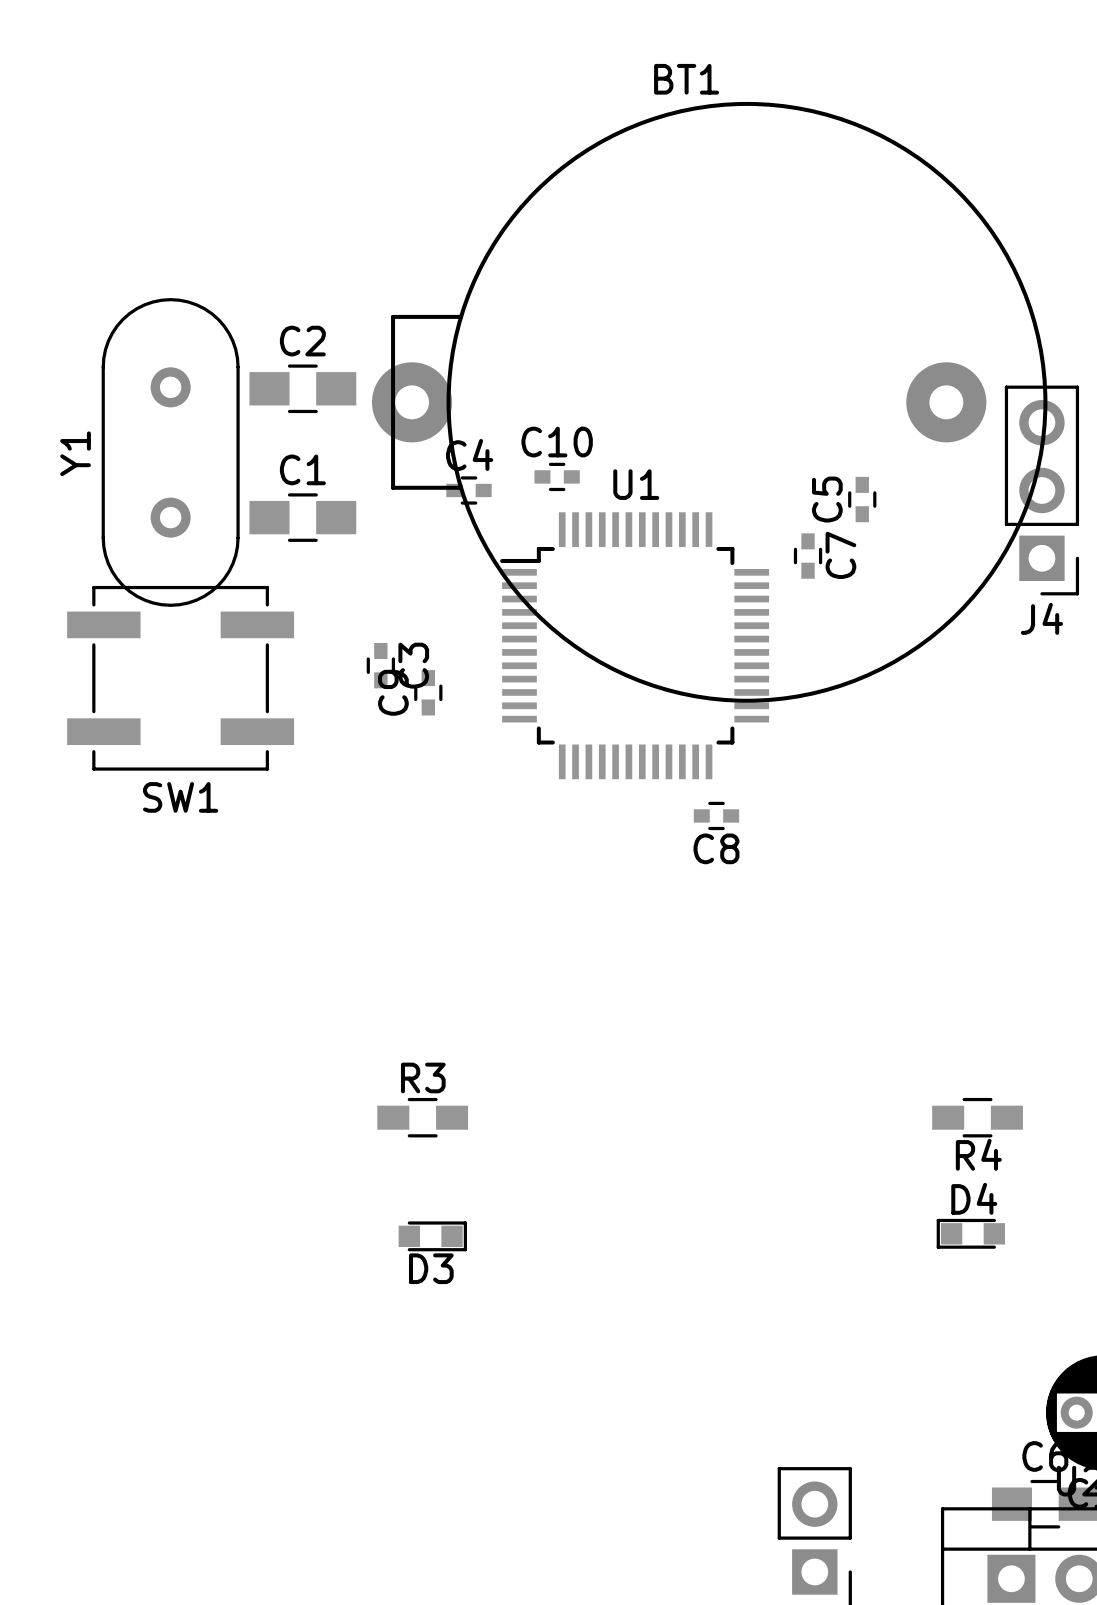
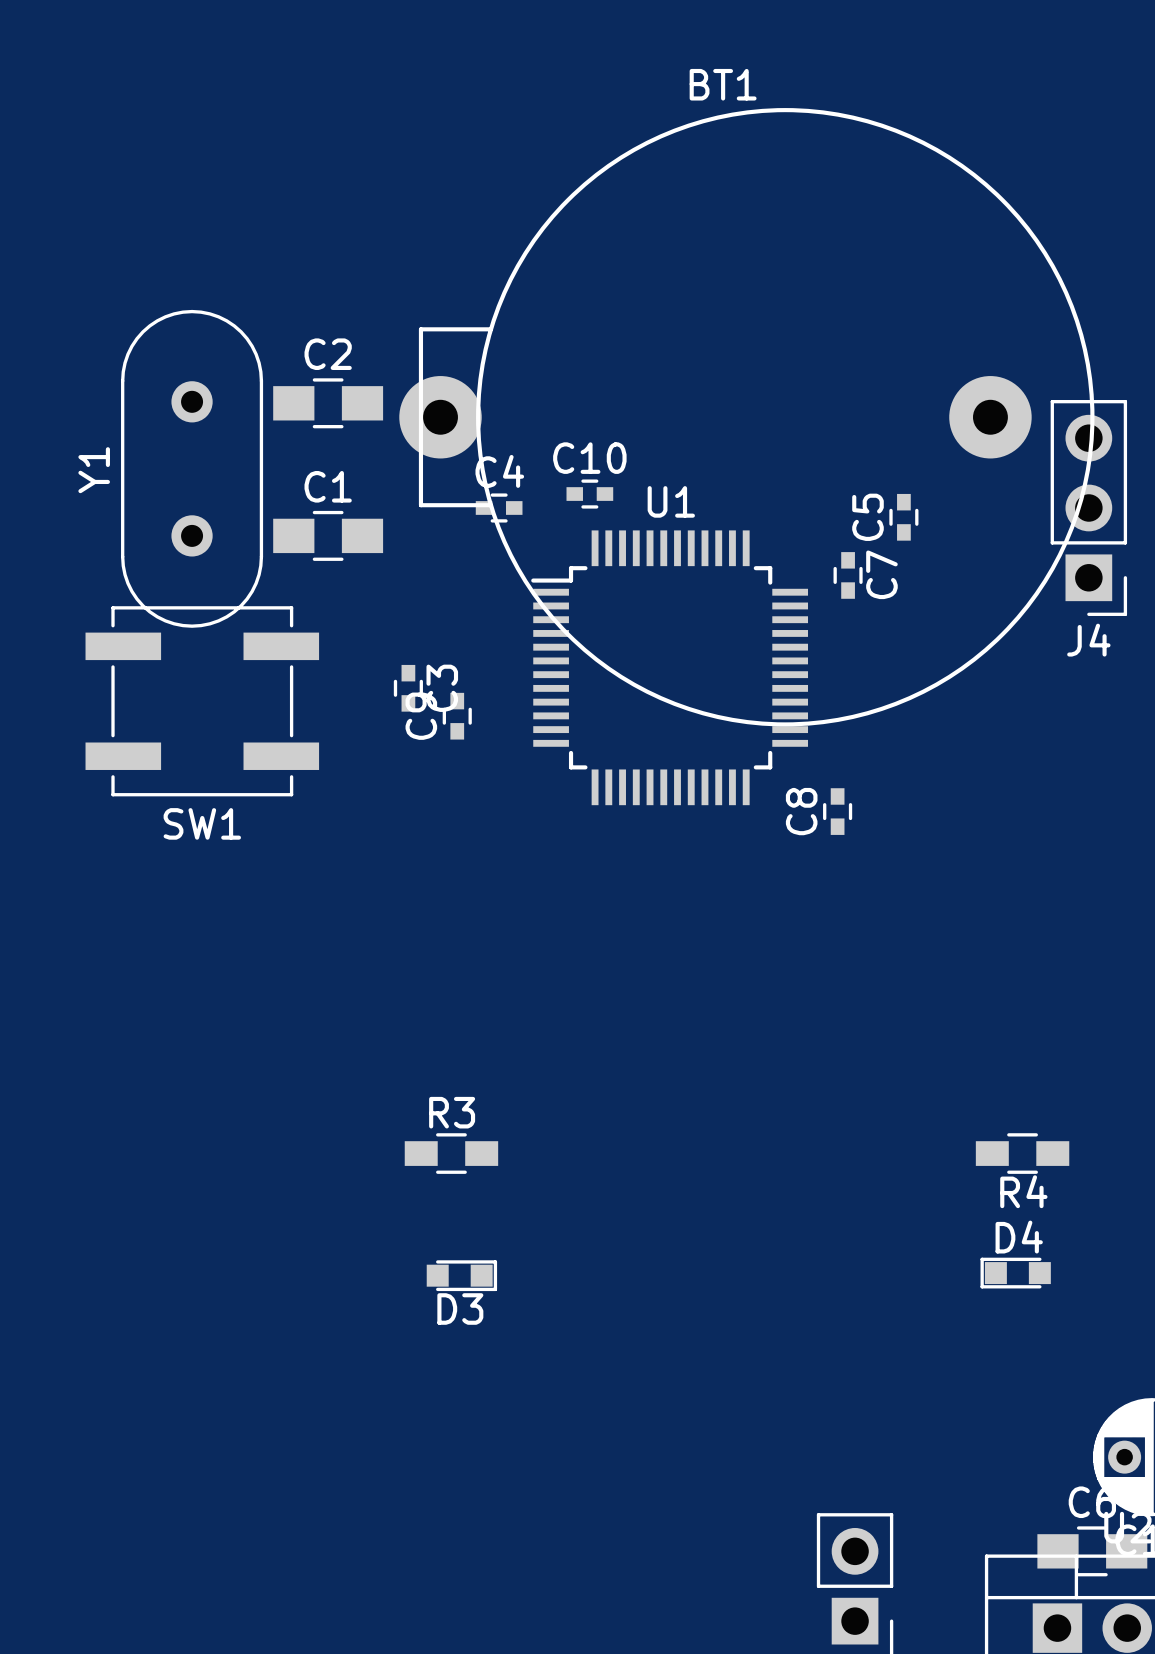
C8 rotation: 0° (716, 815) -> 90° clockwise (837, 811)
C8 position: (716, 815) -> (837, 811)

